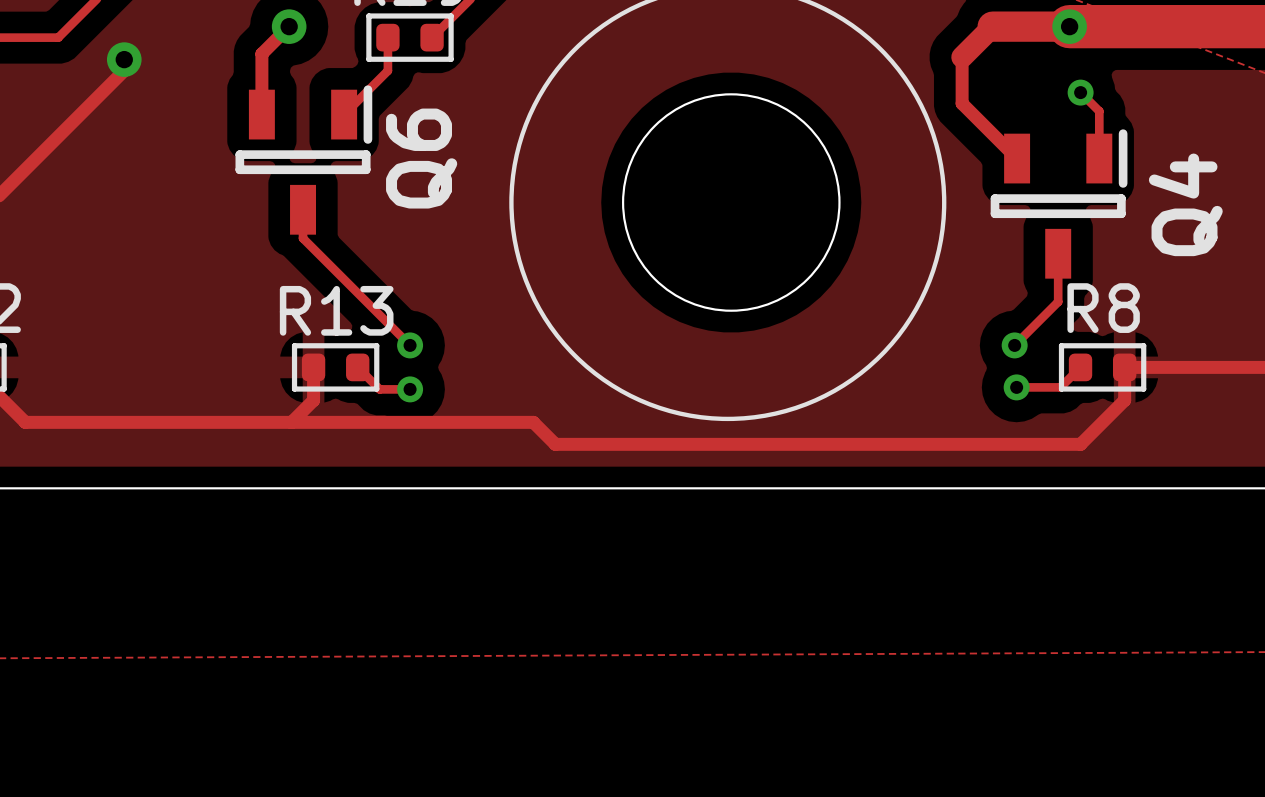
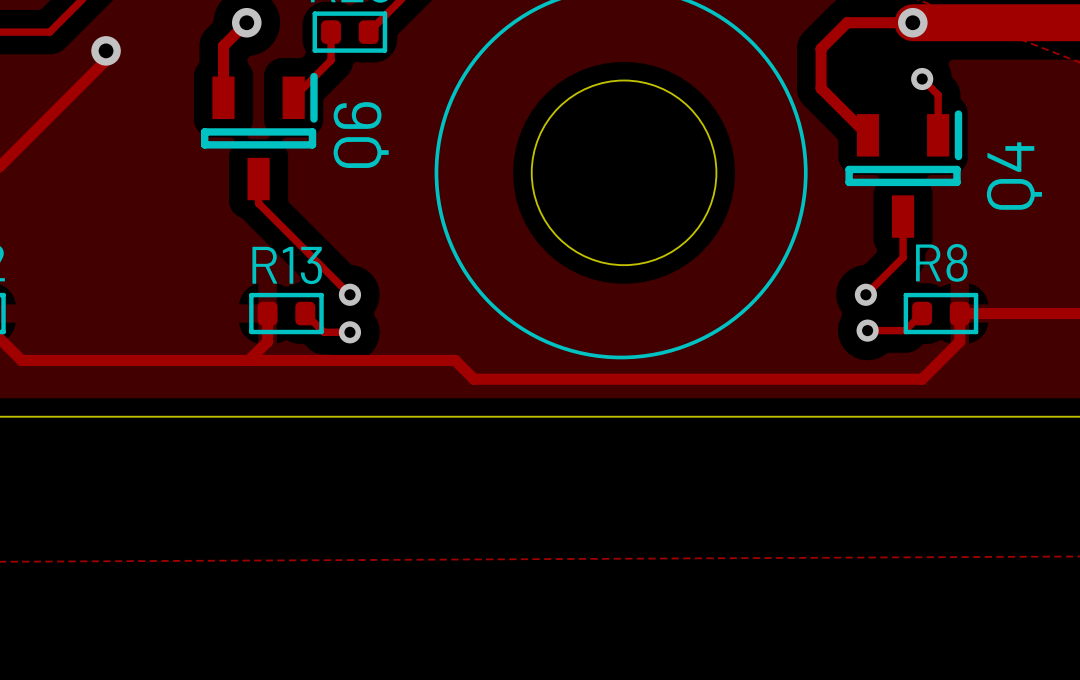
track width: thick (1069, 26) (992, 26) (962, 57) -> thin (912, 22) (847, 22) (821, 48)

